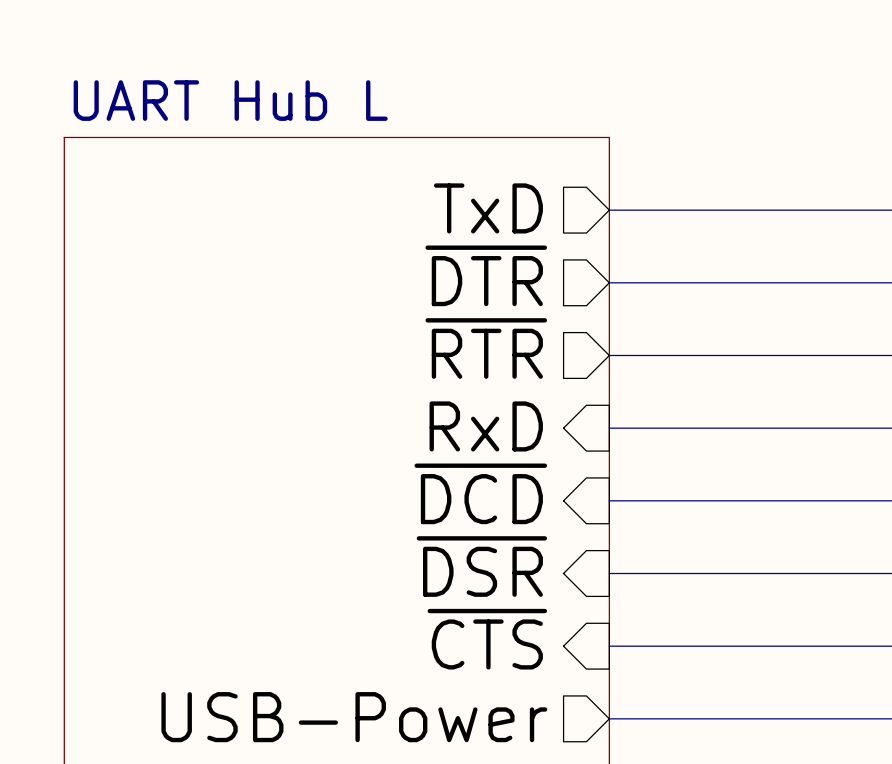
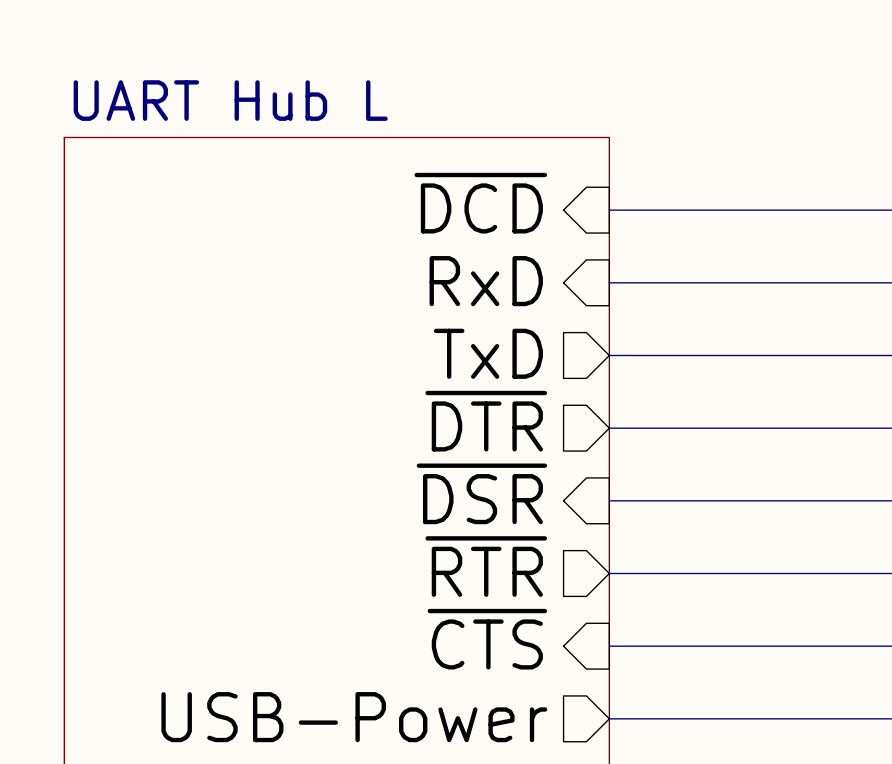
sheet pin shape: output (488, 208) -> input (480, 203)
sheet pin: TxD (488, 208) -> ~{DCD} (480, 203)
sheet pin shape: output (486, 275) -> input (486, 281)
sheet pin: ~{DTR} (486, 275) -> RxD (486, 281)
sheet pin: ~{RTR} (486, 348) -> TxD (488, 353)
sheet pin shape: input (486, 426) -> output (486, 421)
sheet pin: RxD (486, 426) -> ~{DTR} (486, 421)
sheet pin: ~{DCD} (480, 493) -> ~{DSR} (481, 493)
sheet pin shape: input (481, 566) -> output (486, 566)
sheet pin: ~{DSR} (481, 566) -> ~{RTR} (486, 566)

